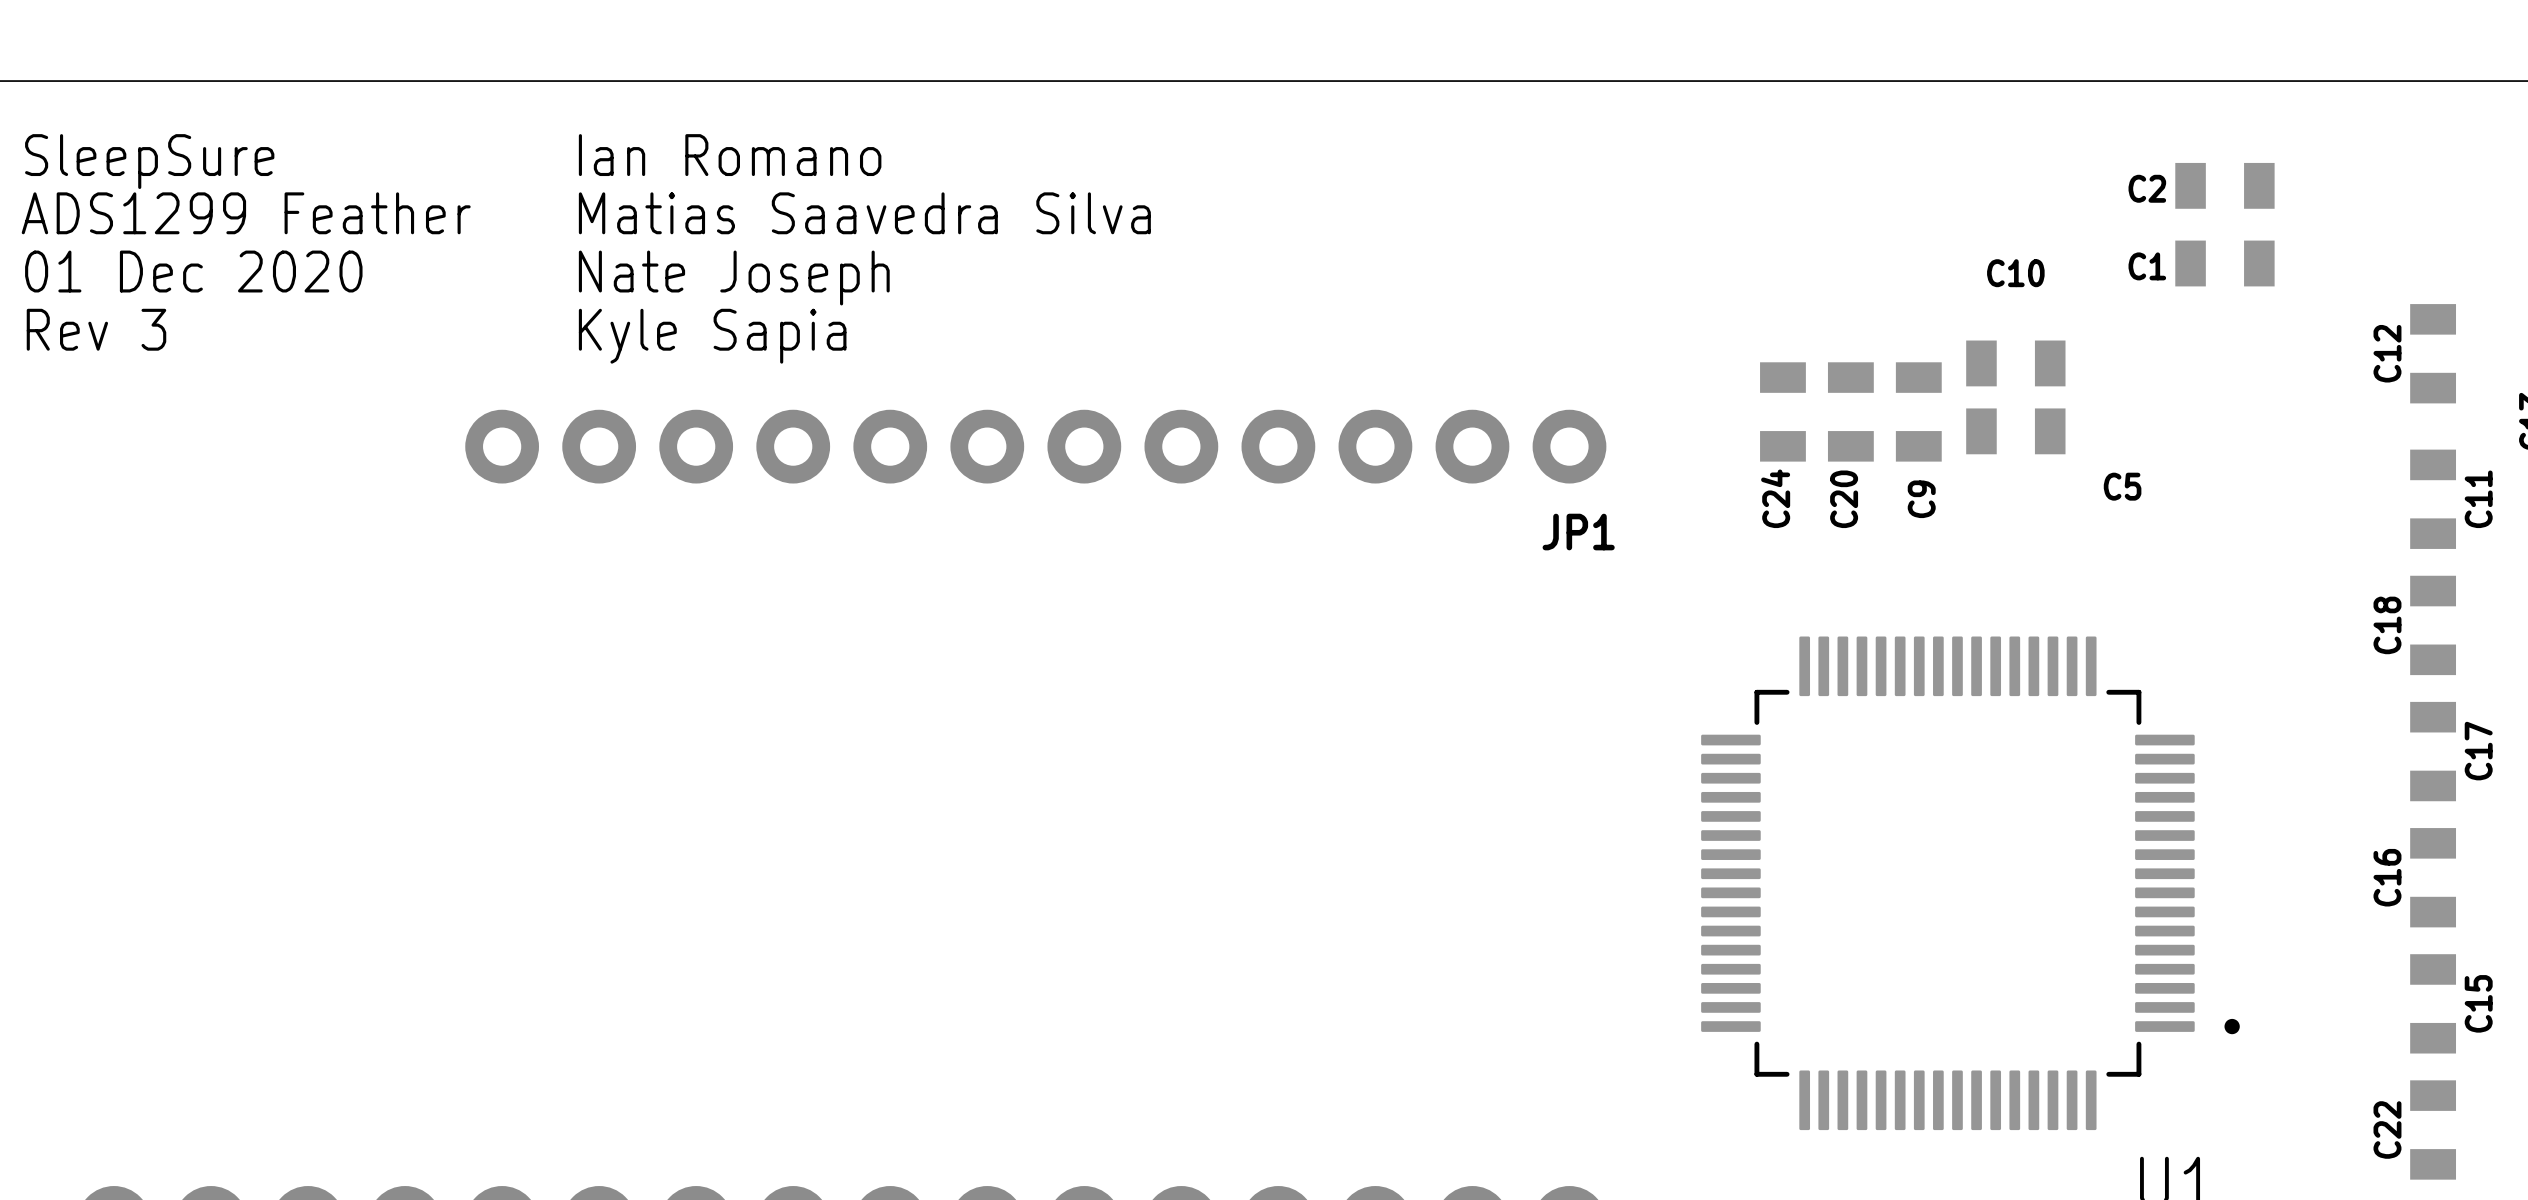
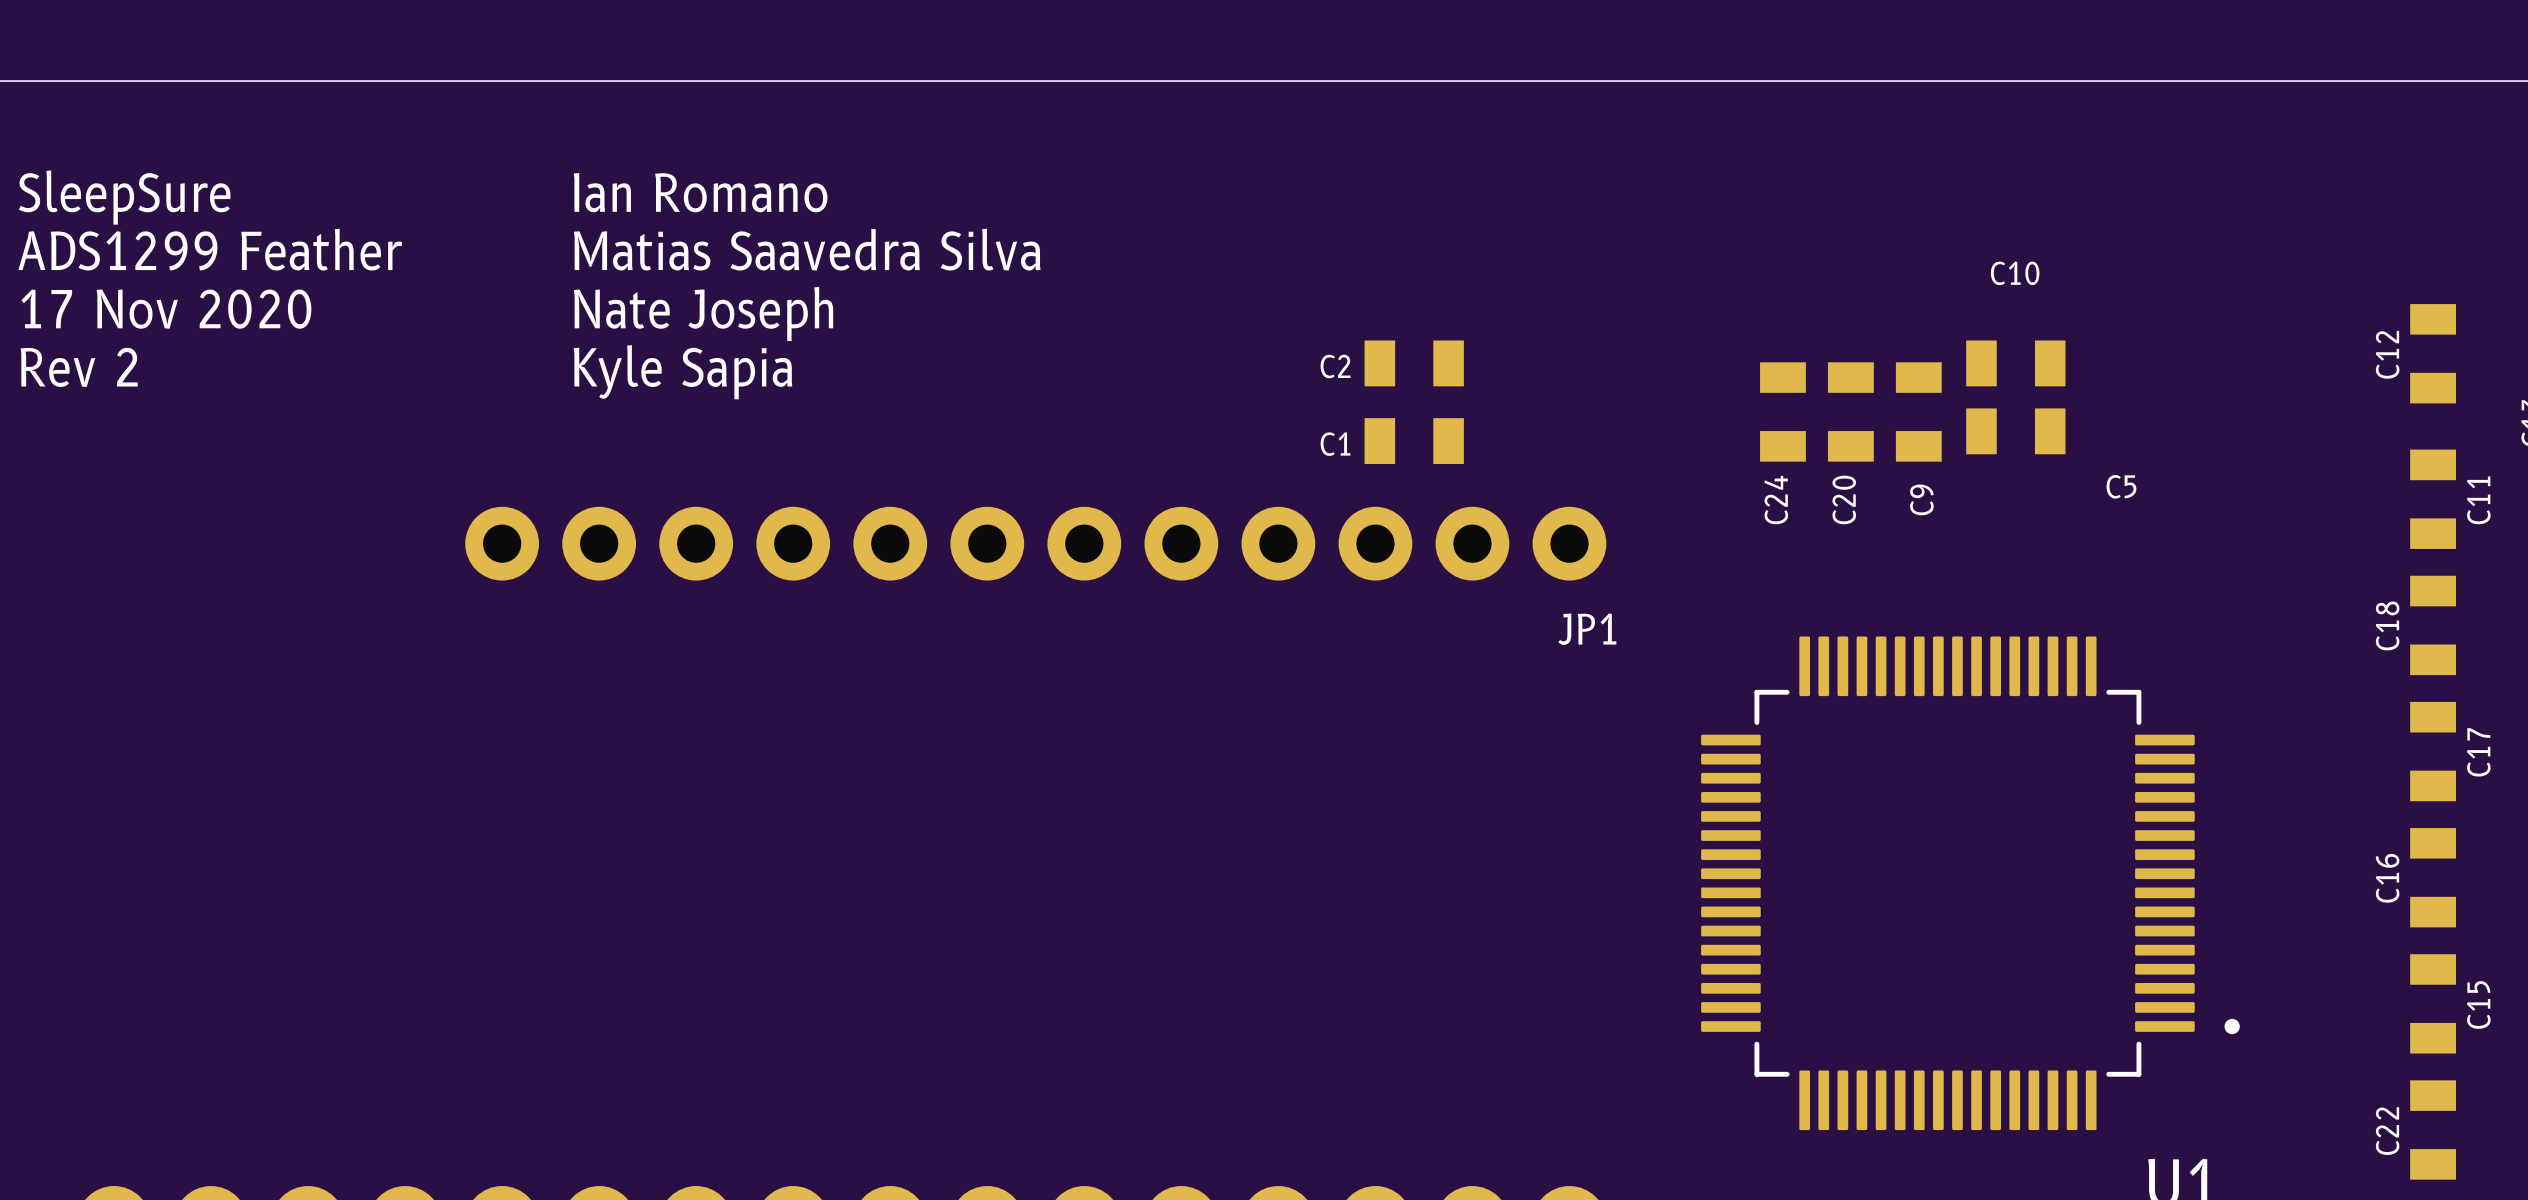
text position: Ian Romano (730, 155) -> Ian Romano (700, 192)
text position: SleepSure (149, 161) -> SleepSure (124, 197)
C2 position: (2224, 185) -> (1414, 363)
text position: ADS1299 Feather (246, 213) -> ADS1299 Feather (210, 249)
text position: Matias Saavedra Silva (864, 213) -> Matias Saavedra Silva (807, 249)
C1 position: (2224, 263) -> (1414, 441)
text: 01 Dec 2020 (193, 271) -> 17 Nov 2020 (166, 309)
text position: Nate Joseph (734, 277) -> Nate Joseph (703, 313)
text: Rev 3 (96, 329) -> Rev 2 (79, 367)
text position: Kyle Sapia (712, 336) -> Kyle Sapia (683, 372)
JP1 position: (1035, 446) -> (1035, 543)

